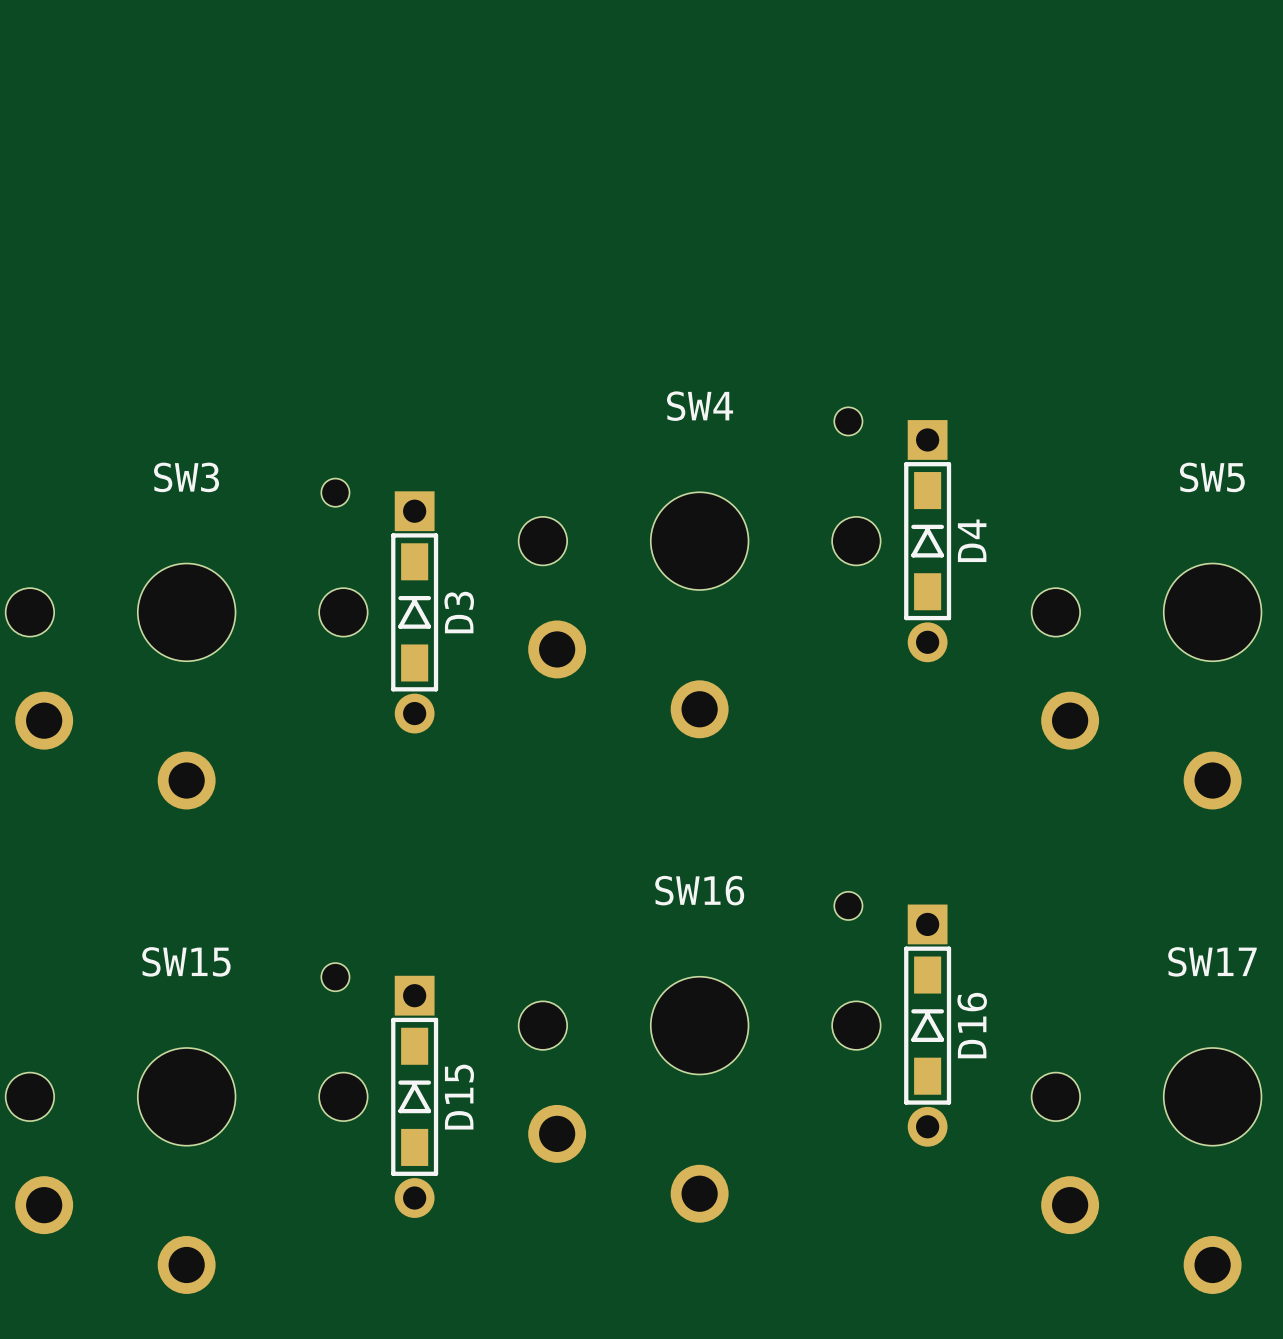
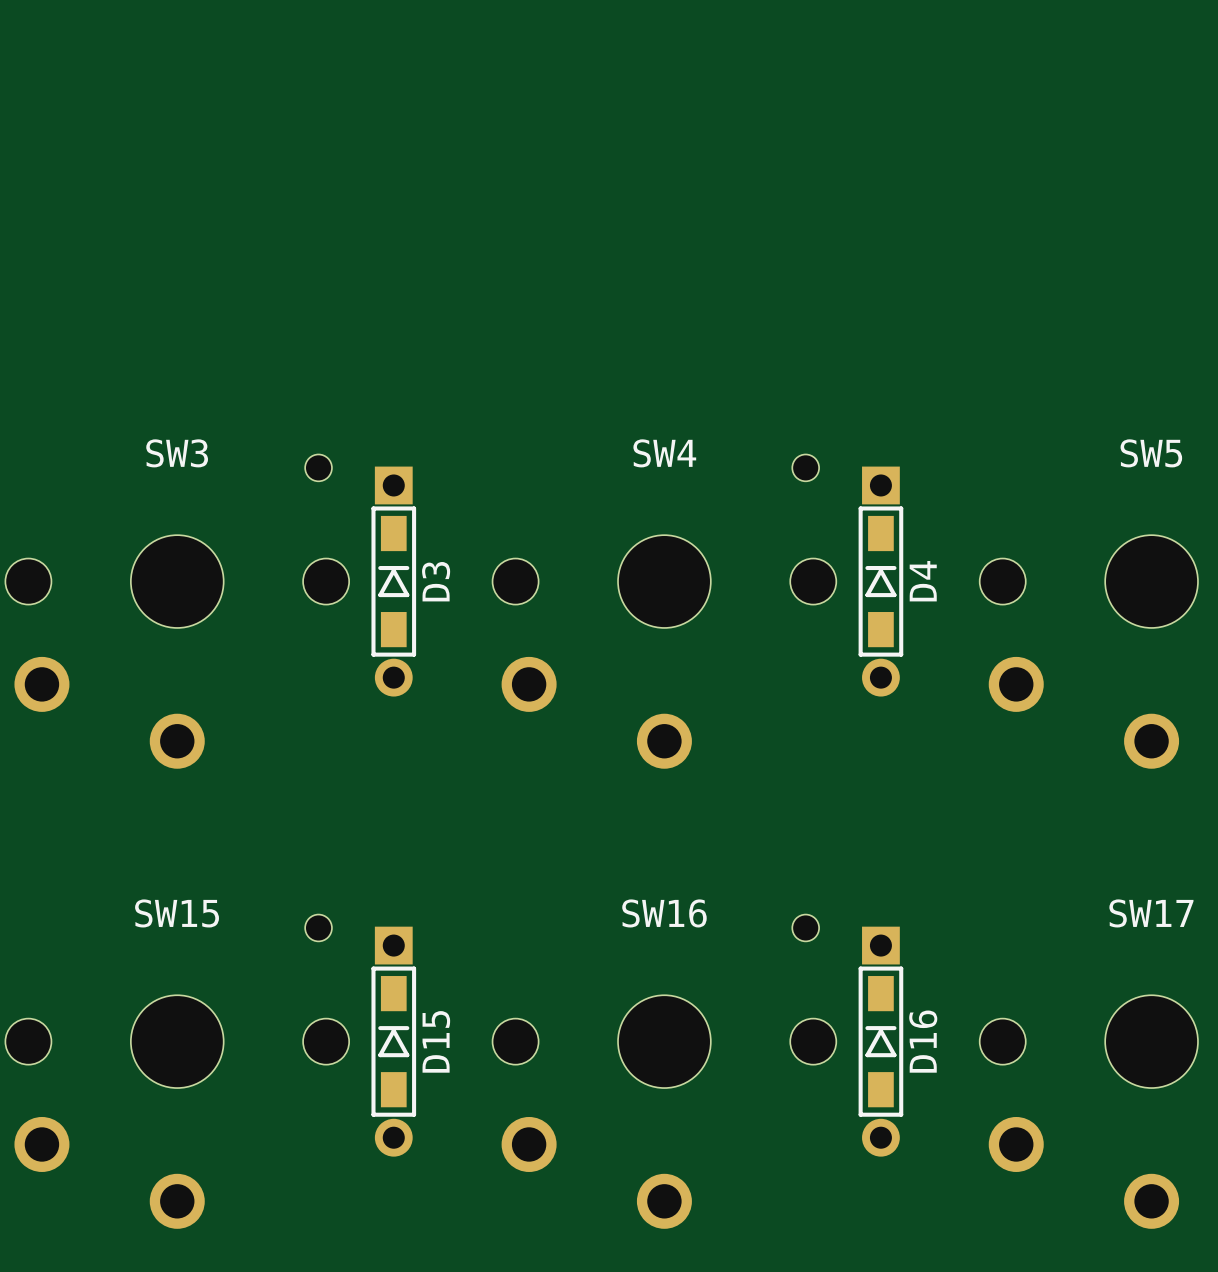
D4 position: (927, 541) -> (880, 581)
SW4 position: (699, 572) -> (664, 611)
D16 position: (927, 1025) -> (880, 1041)
SW16 position: (699, 1057) -> (664, 1071)

